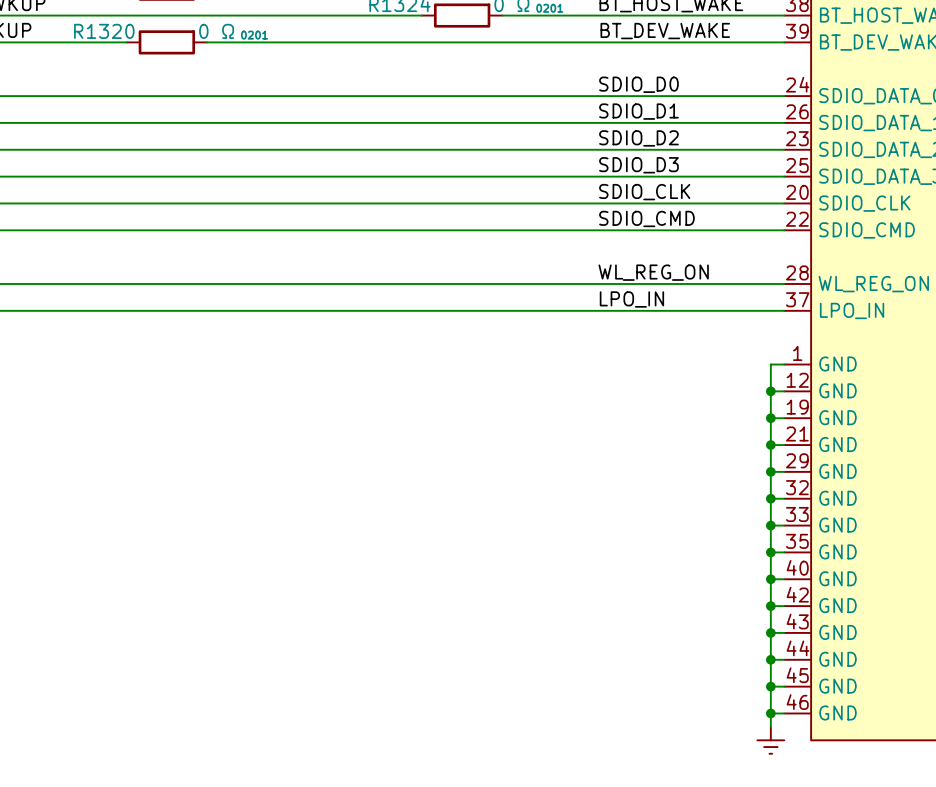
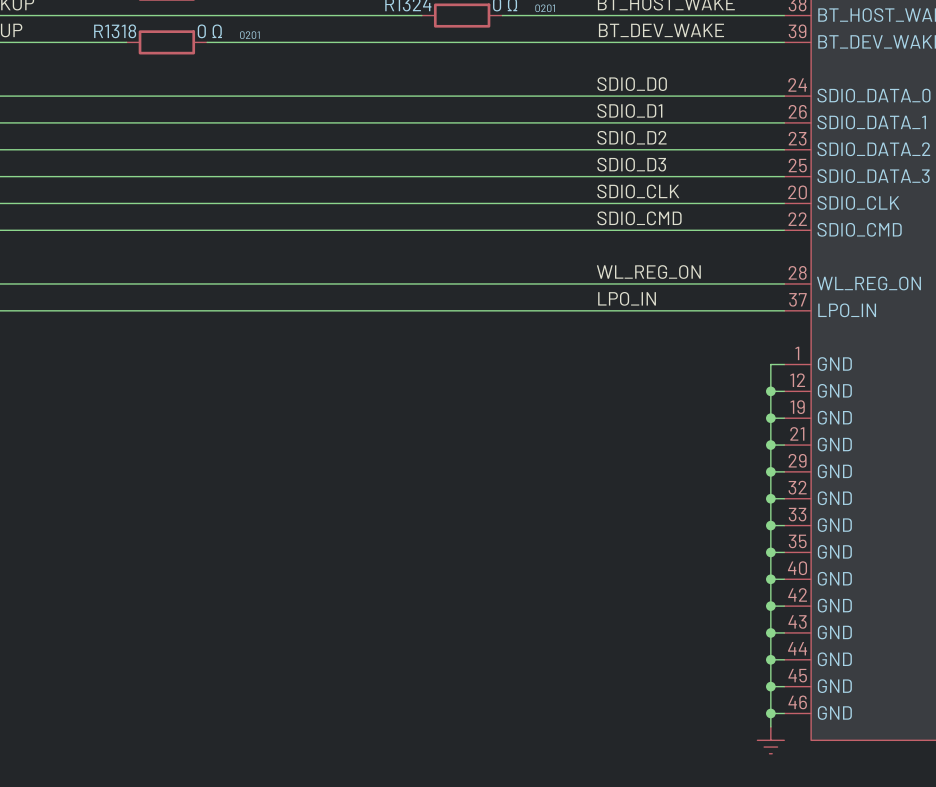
R1320 name: R1320 (104, 31) -> R1318 (115, 31)

